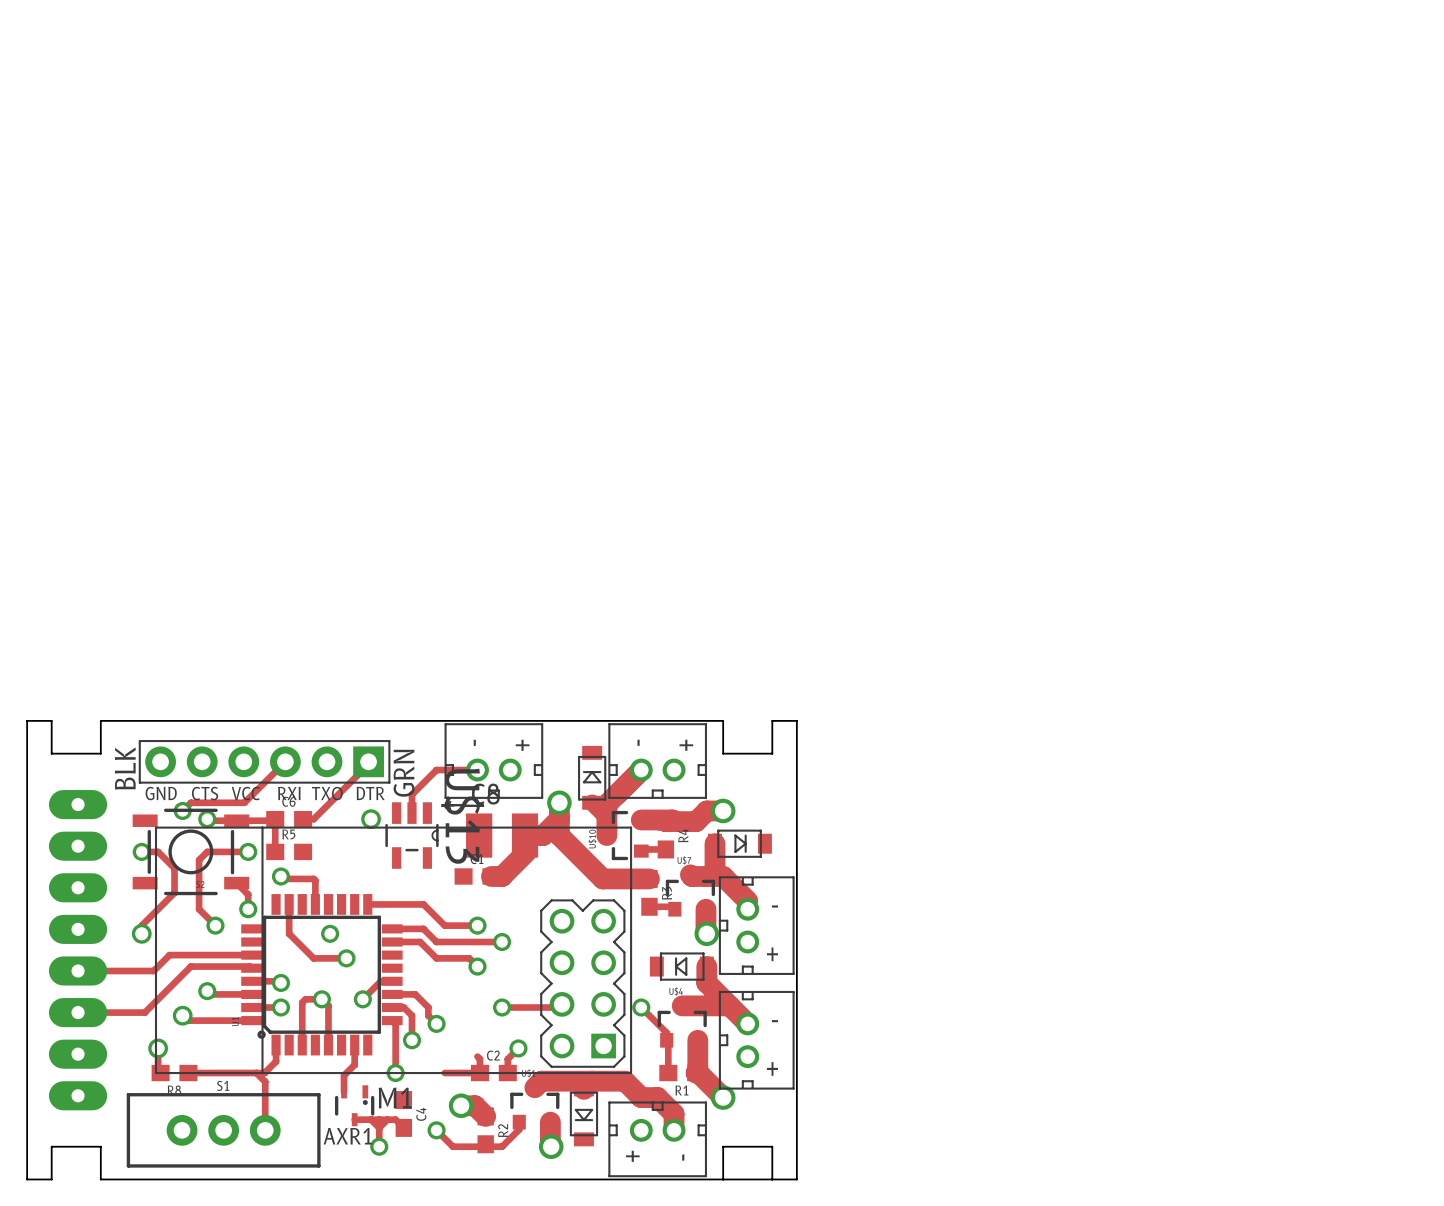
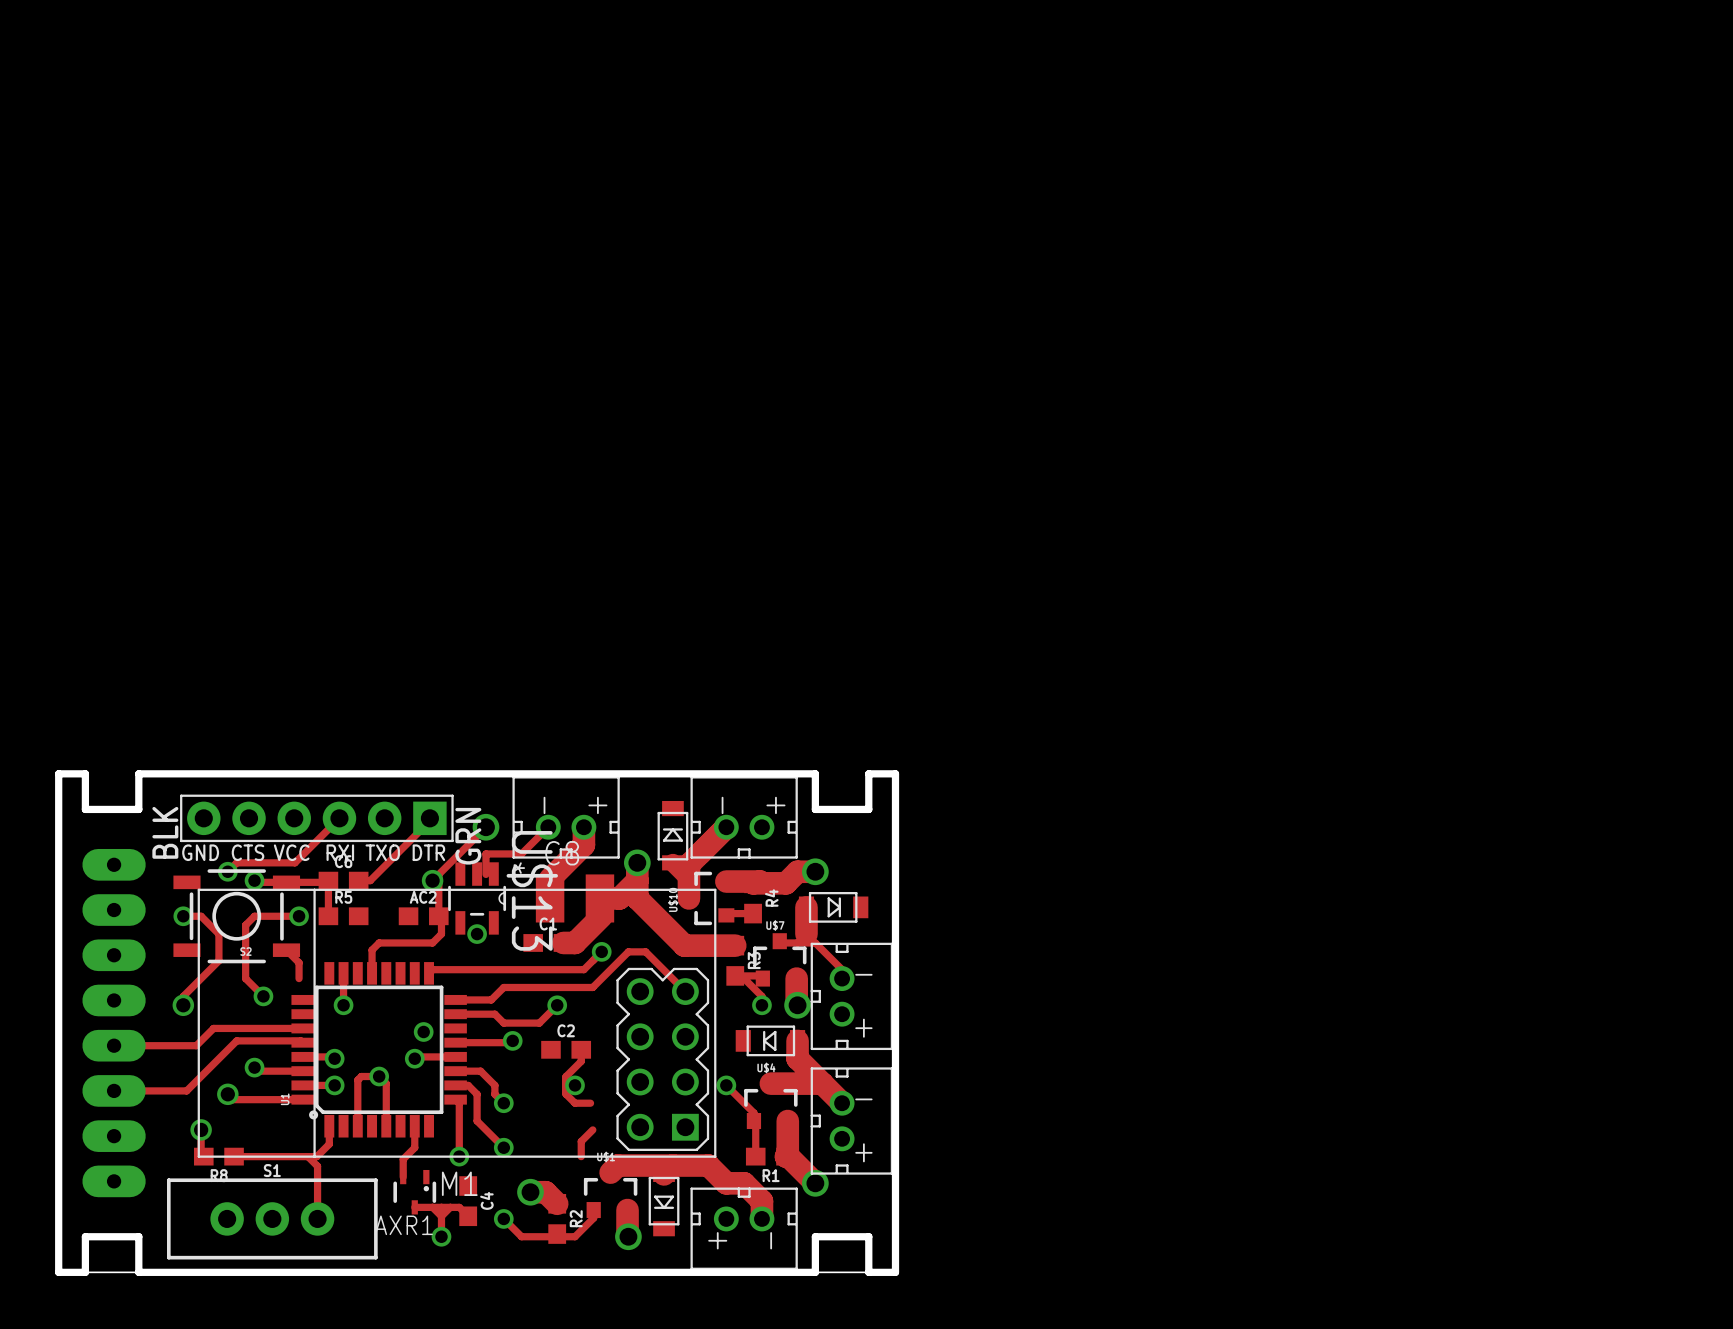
board edge width: thin (27, 720) (51, 720) (51, 753) (100, 753) (100, 720) (723, 720) (723, 753) (772, 753) (772, 720) (796, 720) (796, 1179) (772, 1179) (772, 1146) (723, 1146) (723, 1179) (100, 1179) (100, 1146) (51, 1146) (51, 1179) (27, 1179) (27, 720) -> thick (58, 773) (85, 773) (85, 809) (138, 809) (138, 773) (815, 773) (815, 809) (868, 809) (868, 773) (895, 773) (895, 1272) (868, 1272) (868, 1236) (815, 1236) (815, 1272) (138, 1272) (138, 1236) (85, 1236) (85, 1272) (58, 1272) (58, 773)
via: none -> (485, 827)
track: (477, 770) (436, 770) (411, 794) (411, 813) -> (548, 827) (521, 853) (485, 853) (485, 874)
track: none -> (583, 827) (583, 845) (550, 878)
AC2: none -> (423, 916)
via: none -> (477, 934)
track width: thick (690, 874) (692, 876) (723, 876) (747, 901) -> thin (779, 941) (781, 942) (815, 942) (842, 969)
track: (280, 876) (283, 878) (313, 878) (315, 883) -> (485, 827) (438, 874) (438, 916) (441, 918) (441, 934) (432, 942) (379, 942) (372, 950)
via: (280, 876) -> none
via: none -> (601, 951)
track: (367, 904) (423, 904) (444, 925) (477, 925) -> (429, 973) (432, 969) (583, 969) (601, 951)
via: (248, 909) -> none
track: none -> (744, 978) (761, 996) (761, 1005)
via: (477, 925) -> none
track: (423, 928) (436, 942) (502, 942) -> (489, 999) (503, 987) (592, 987) (628, 951) (645, 951) (685, 991)
track: (289, 933) (313, 958) (346, 958) -> none
via: none -> (343, 1005)
via: (330, 933) -> none
via: none -> (557, 1005)
via: none -> (761, 1005)
track: (420, 942) (436, 958) (469, 958) (477, 966) -> (485, 1014) (494, 1014) (503, 1023) (539, 1023) (557, 1005)
via: (502, 942) -> none
via position: (346, 958) -> (423, 1031)
track: none -> (512, 1040) (510, 1042) (455, 1042)
via: none -> (512, 1040)
via: (477, 966) -> none
track: none -> (581, 1049) (581, 1061) (566, 1076) (566, 1094) (575, 1103) (590, 1103)
track: (380, 981) (362, 999) -> (443, 1056) (416, 1056) (414, 1058)
via: none -> (414, 1058)
via: (362, 999) -> none
track: (562, 1004) (558, 1007) (502, 1007) -> none
track: none -> (477, 1121) (503, 1147)
via position: (411, 1040) -> (503, 1147)
via: (518, 1048) -> none
track: (477, 1056) (479, 1059) (479, 1073) (444, 1073) -> none
C2 position: (493, 1073) -> (566, 1049)
board edge: none -> (85, 1272) (138, 1272)

